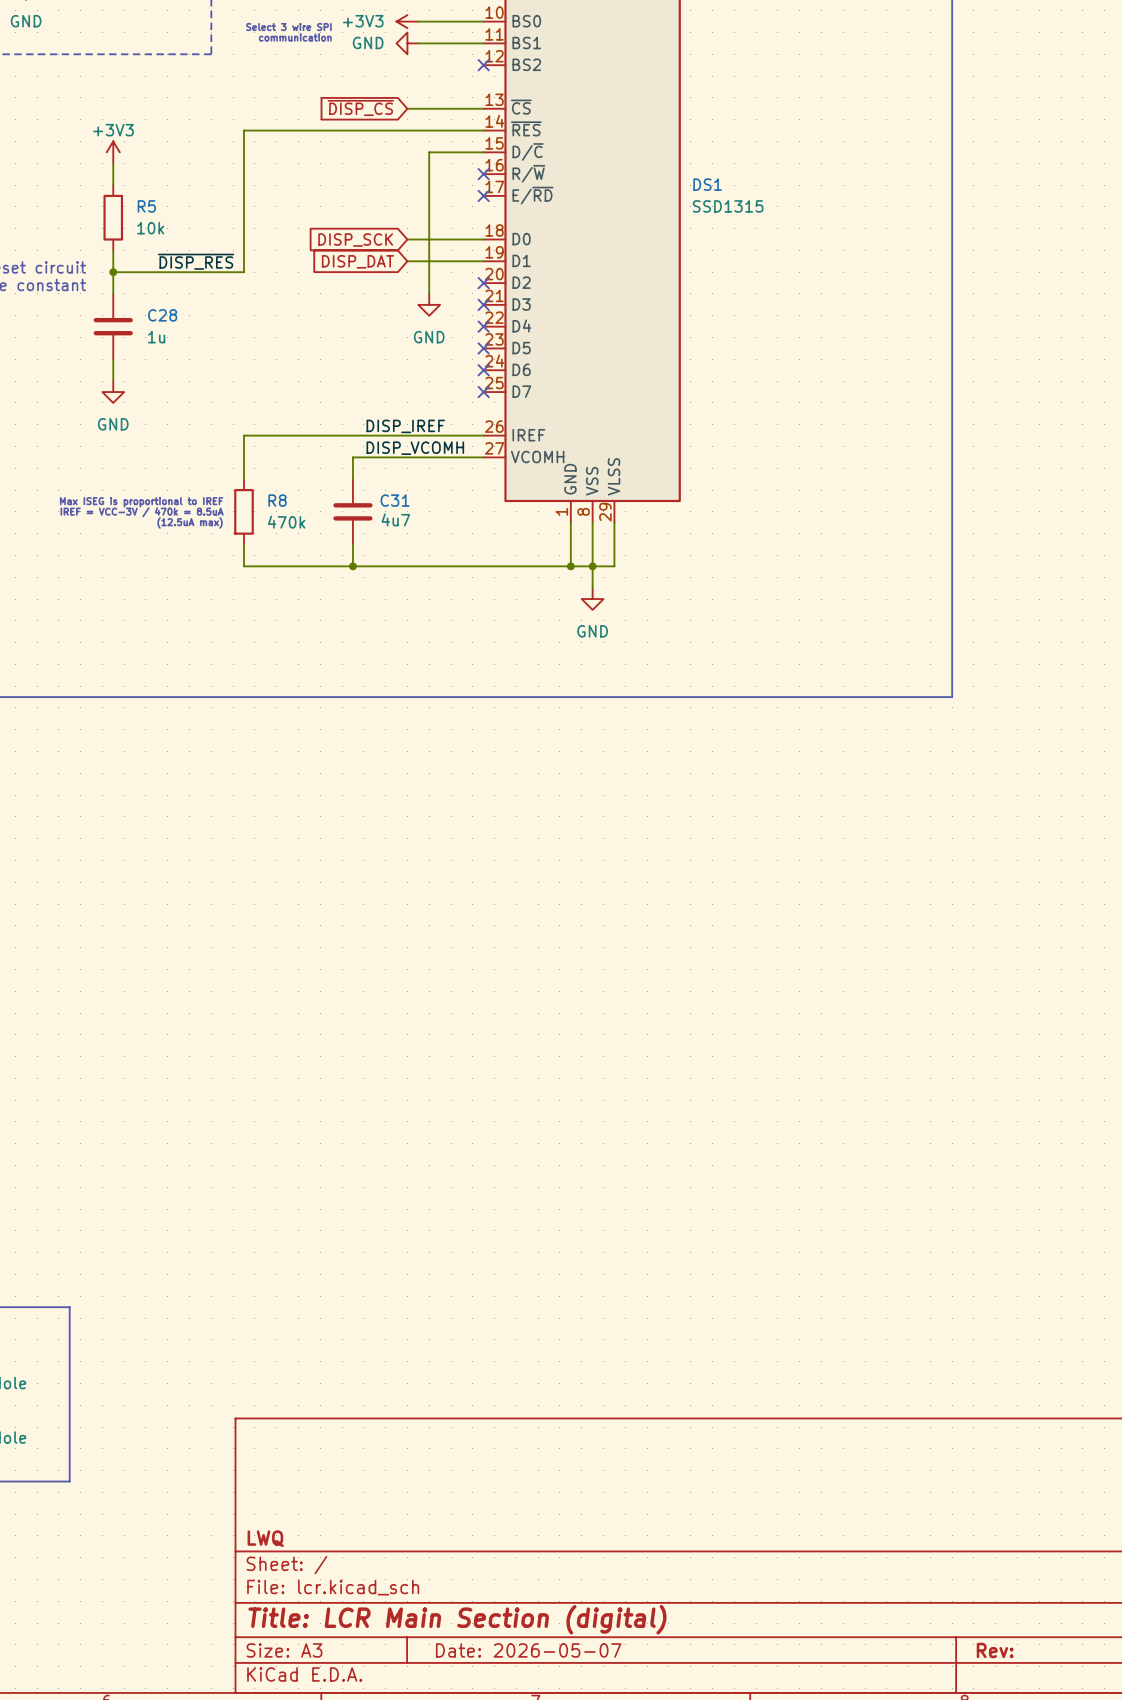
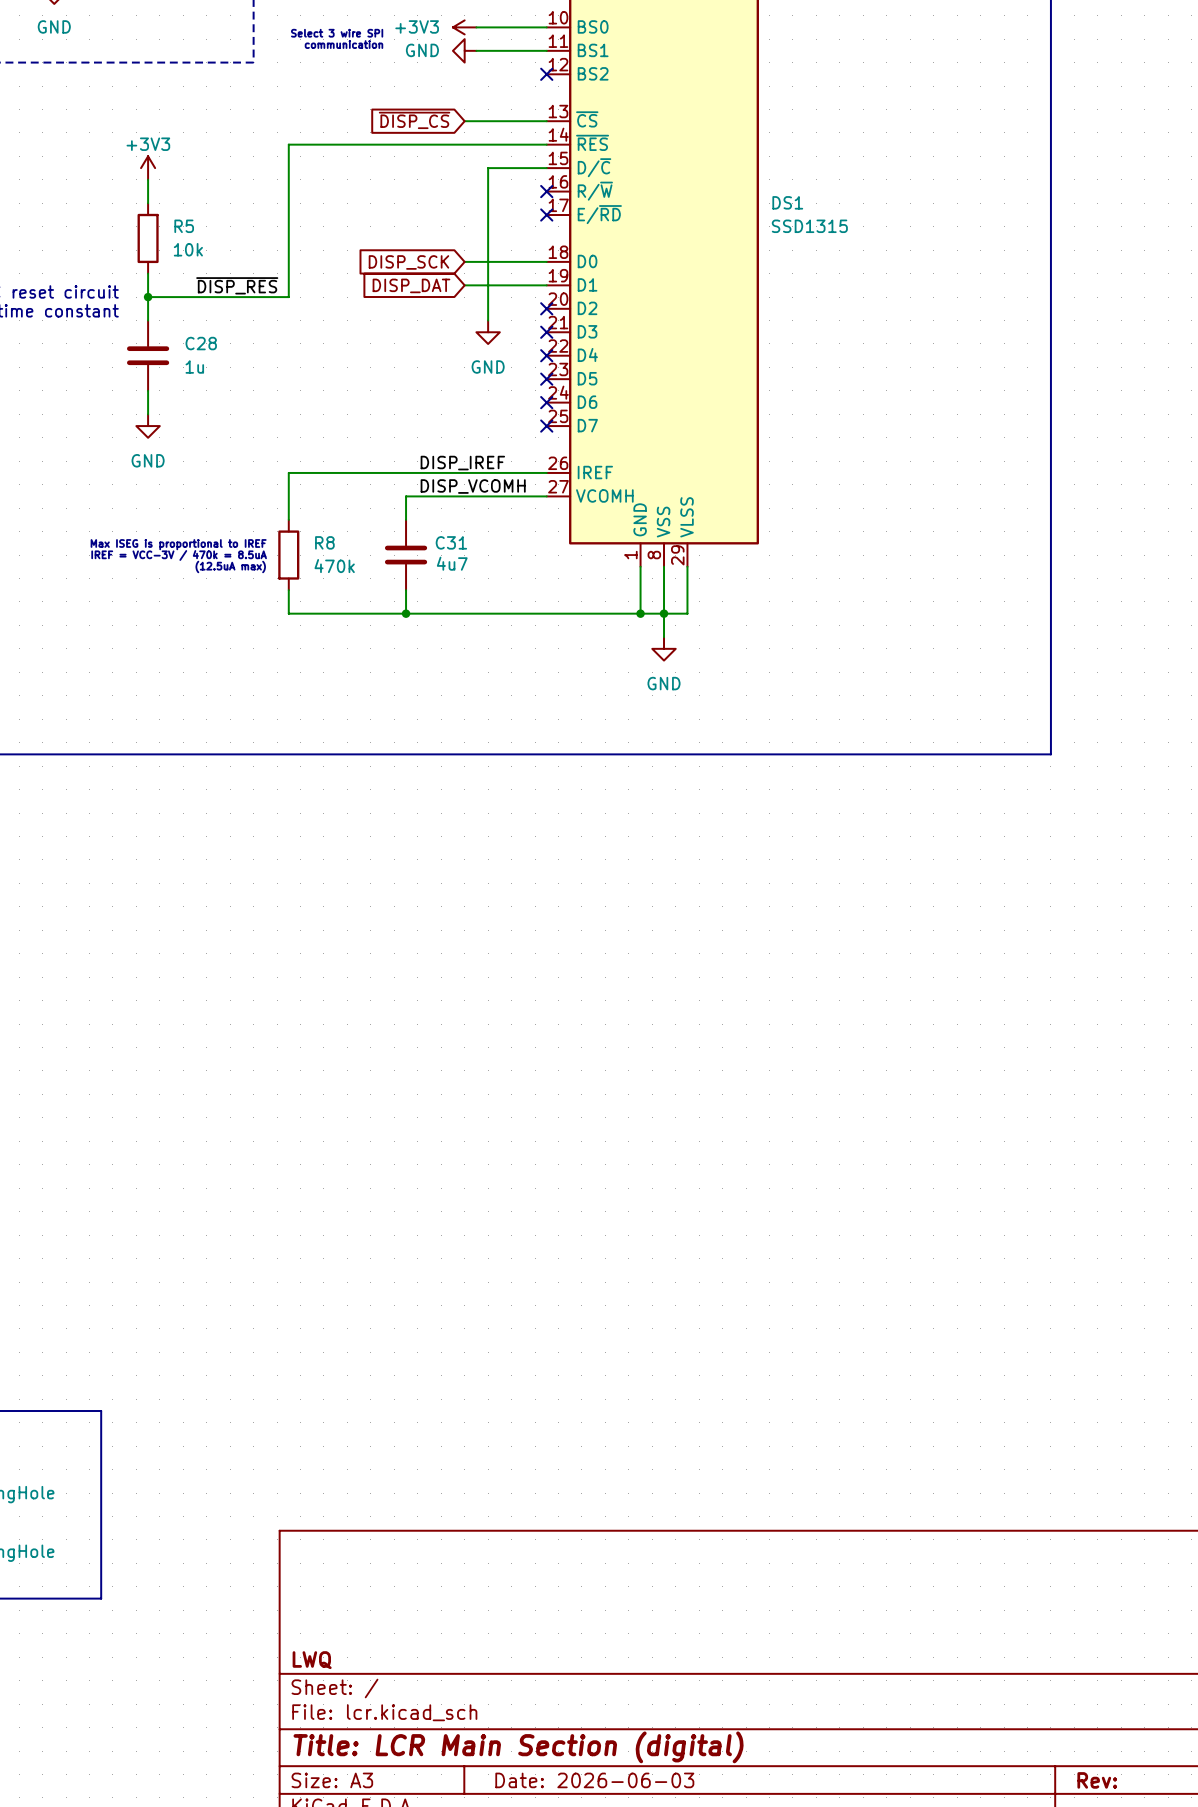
title block: Date: 2026-05-07 (528, 1650) -> Date: 2026-06-03 (594, 1780)

